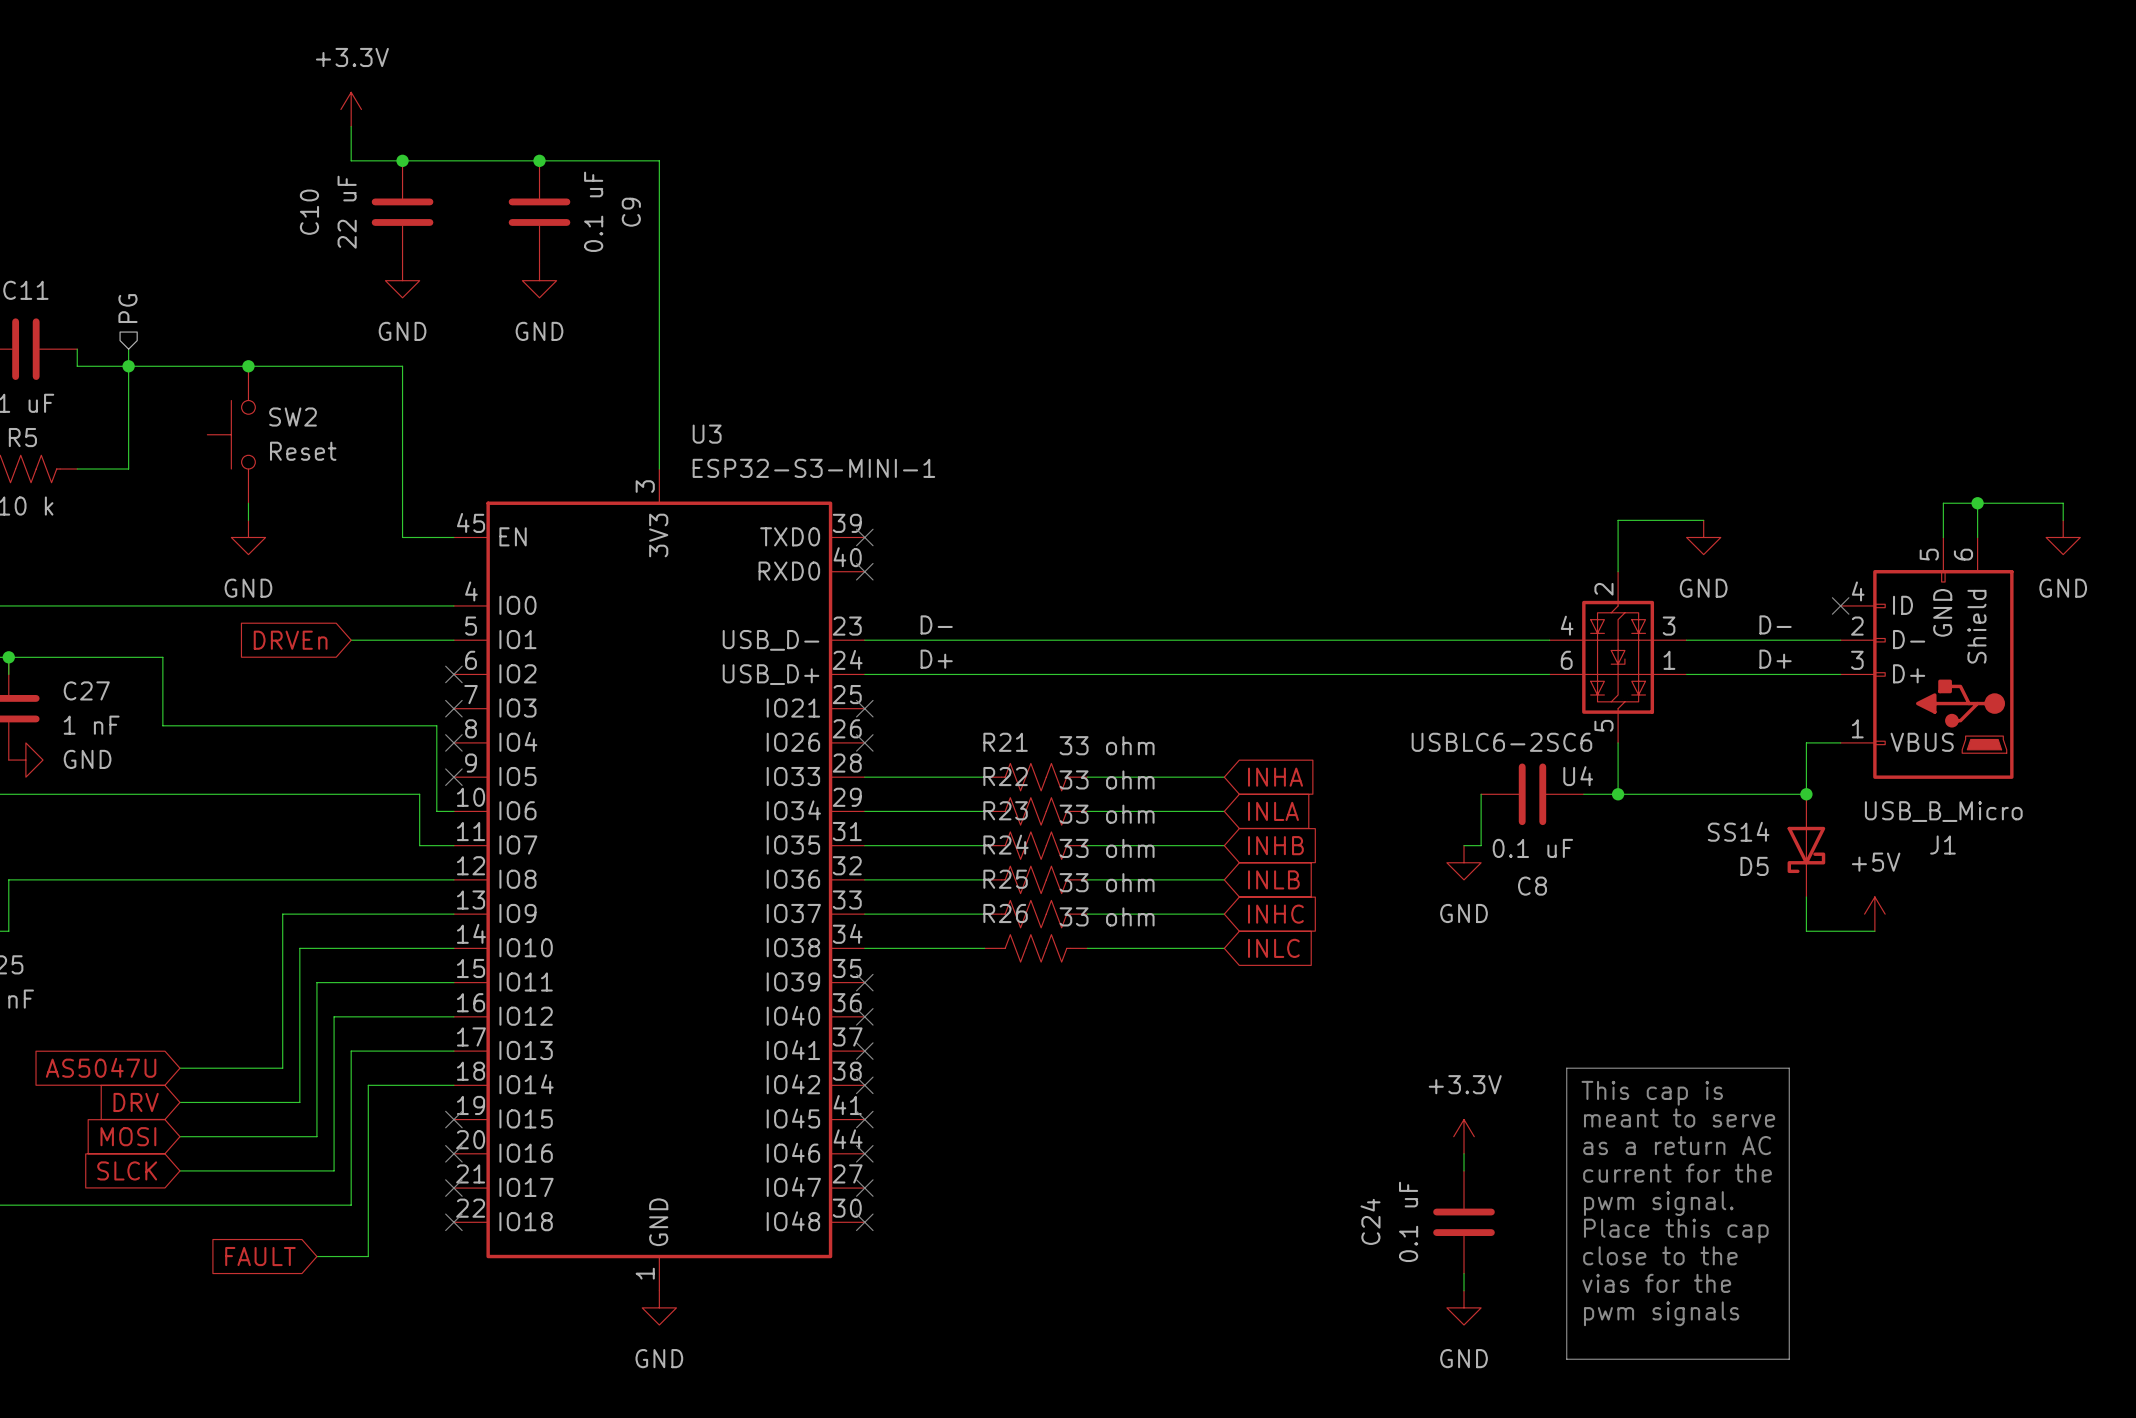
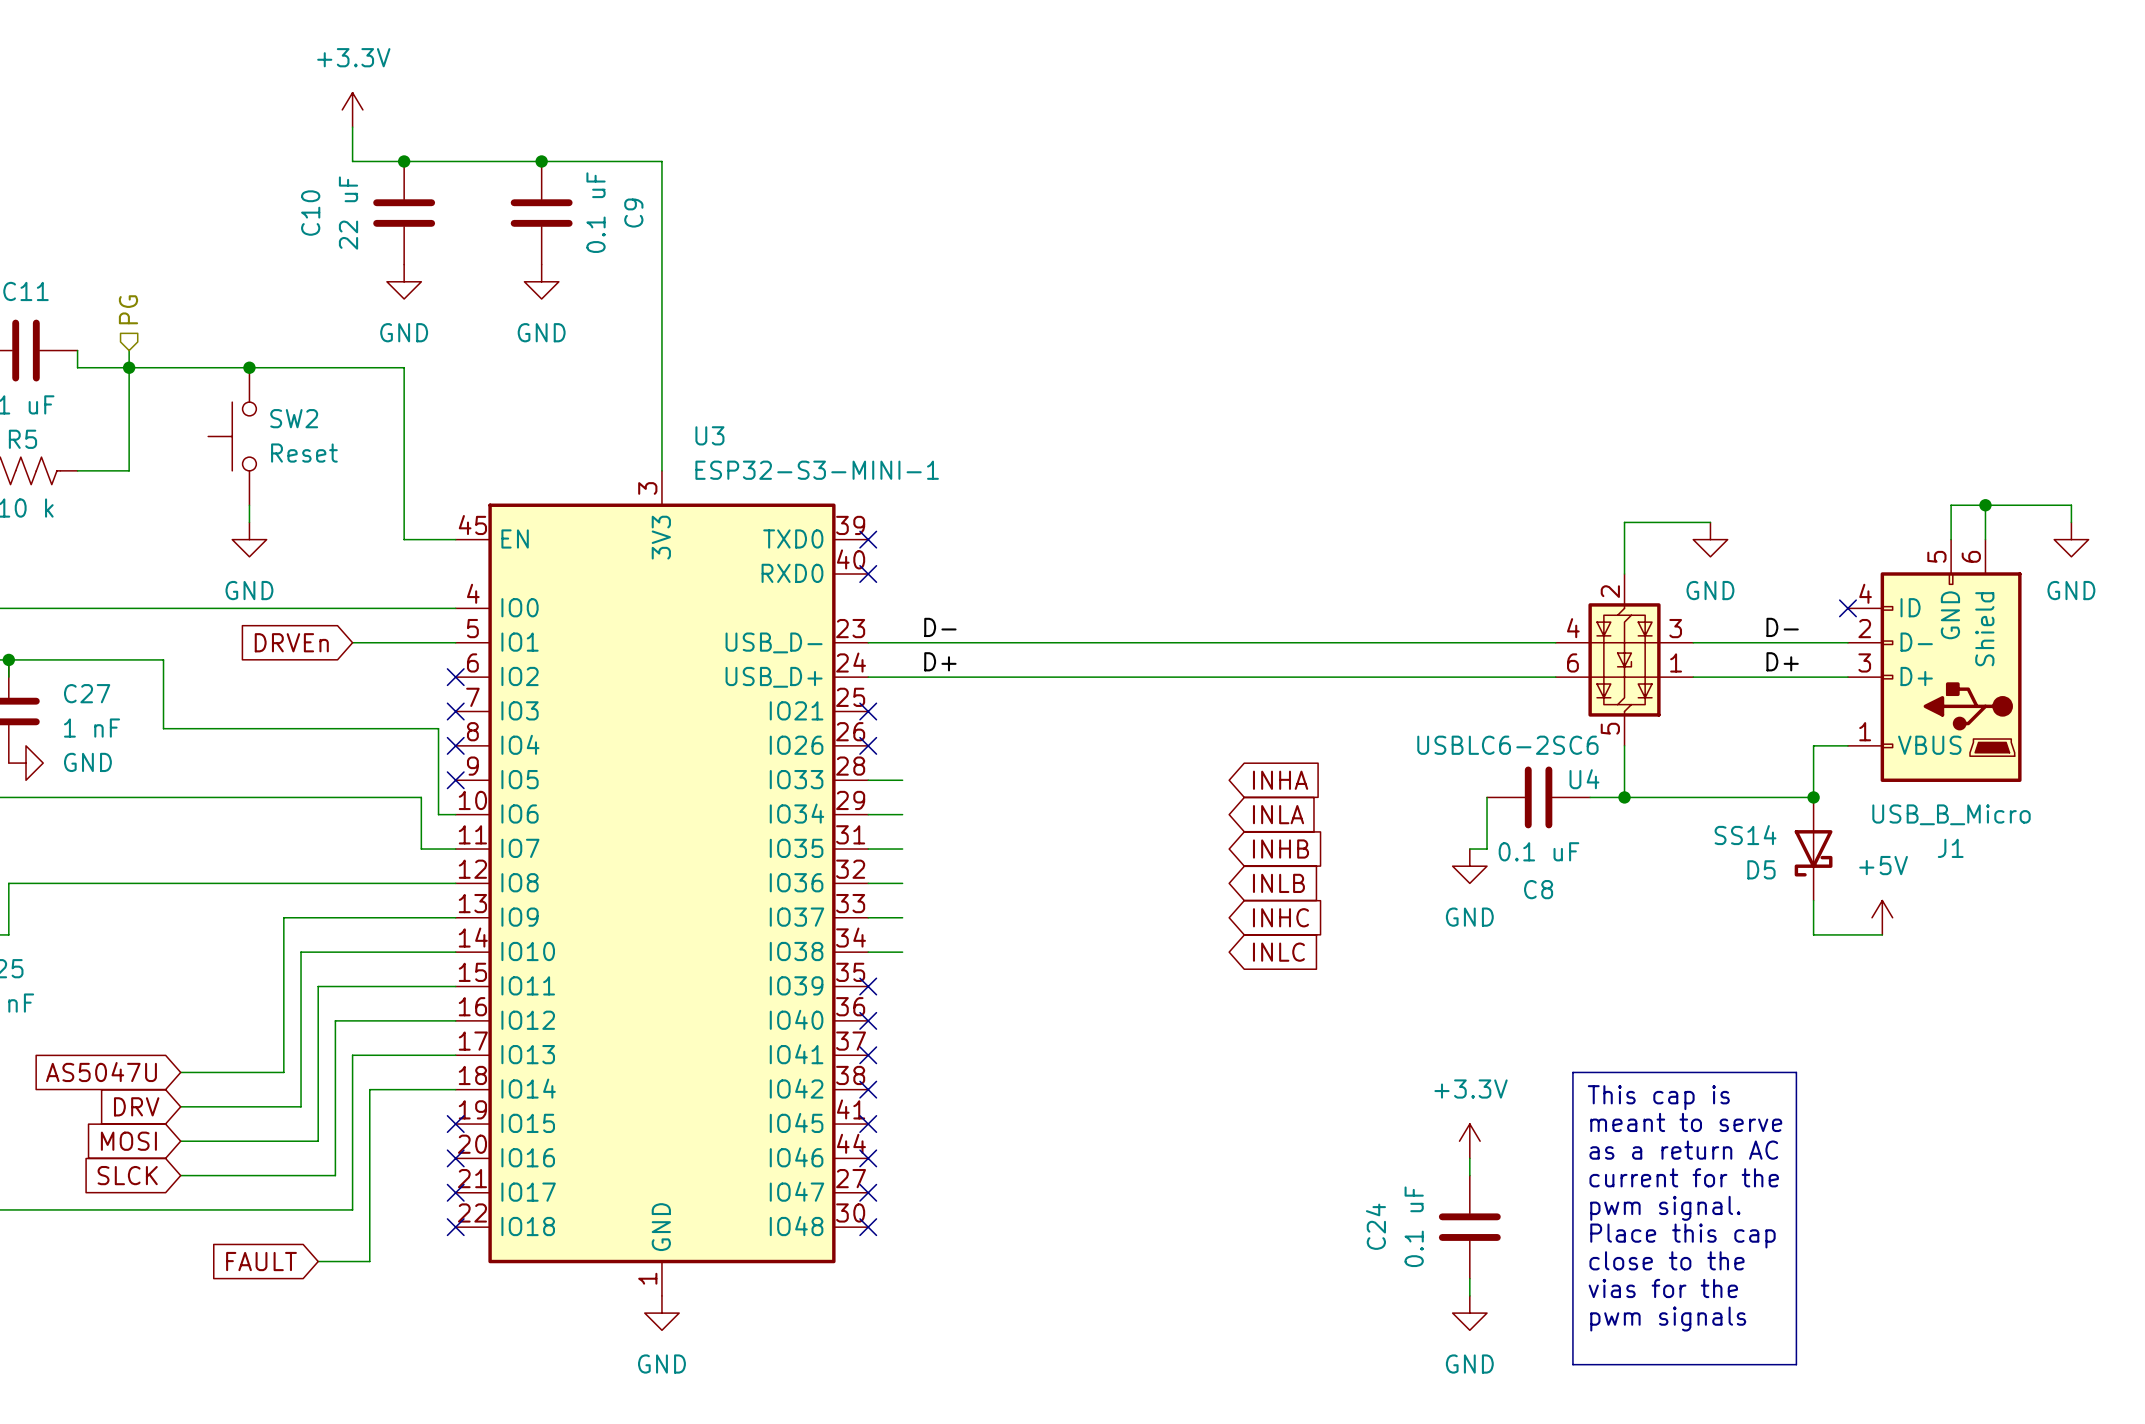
wire: (899, 777) (984, 777) -> none
R21: 33 ohm (1035, 777) -> none
wire: (1087, 777) (1224, 777) -> none
wire: (899, 811) (984, 811) -> none
R22: 33 ohm (1035, 811) -> none
wire: (1087, 811) (1224, 811) -> none
wire: (899, 845) (984, 845) -> none
R23: 33 ohm (1035, 845) -> none
wire: (1087, 845) (1224, 845) -> none
wire: (899, 879) (984, 879) -> none
R24: 33 ohm (1035, 879) -> none
wire: (1087, 879) (1224, 879) -> none
wire: (899, 914) (984, 914) -> none
R25: 33 ohm (1035, 914) -> none
wire: (1087, 914) (1224, 914) -> none
wire: (899, 948) (984, 948) -> none
R26: 33 ohm (1035, 948) -> none
wire: (1087, 948) (1224, 948) -> none

